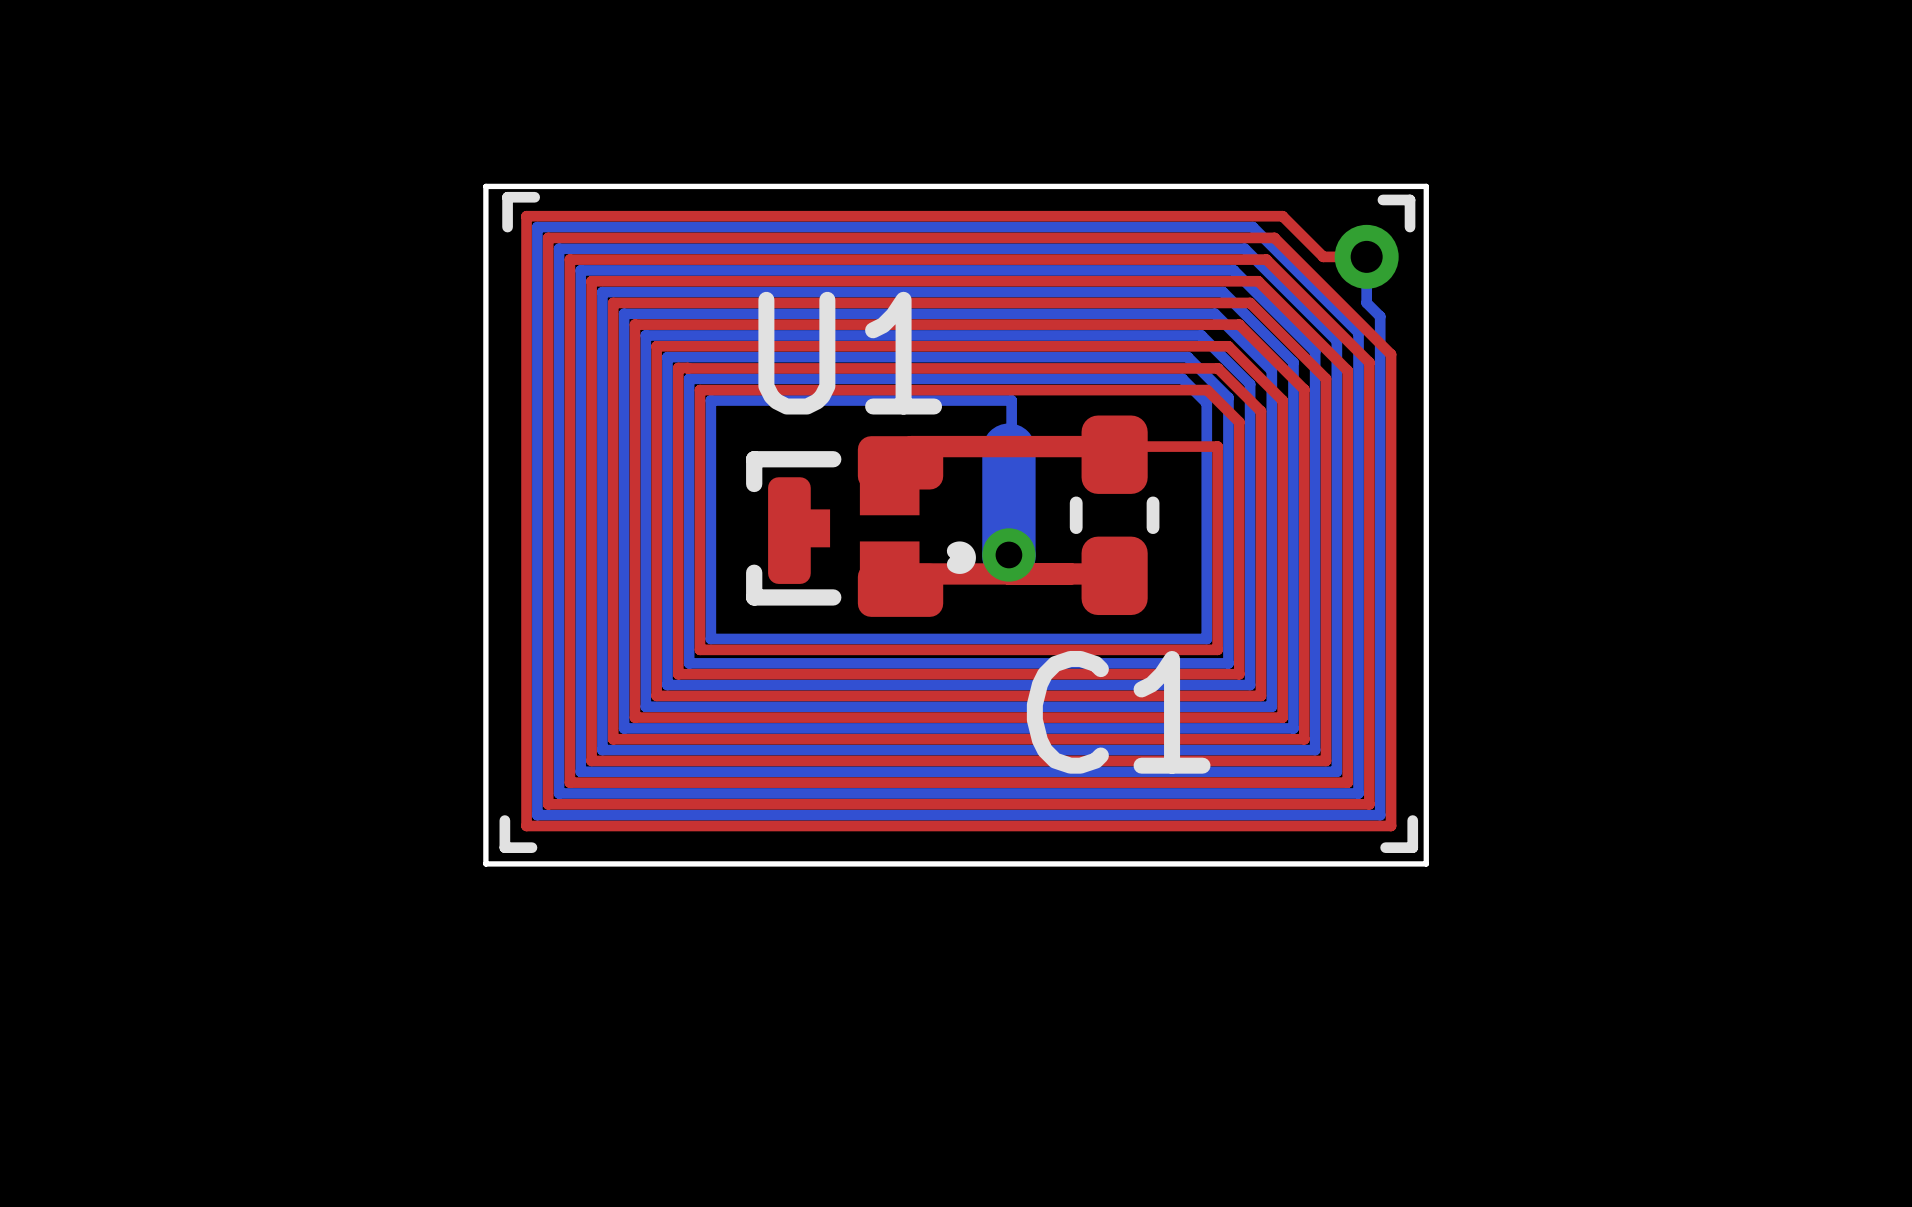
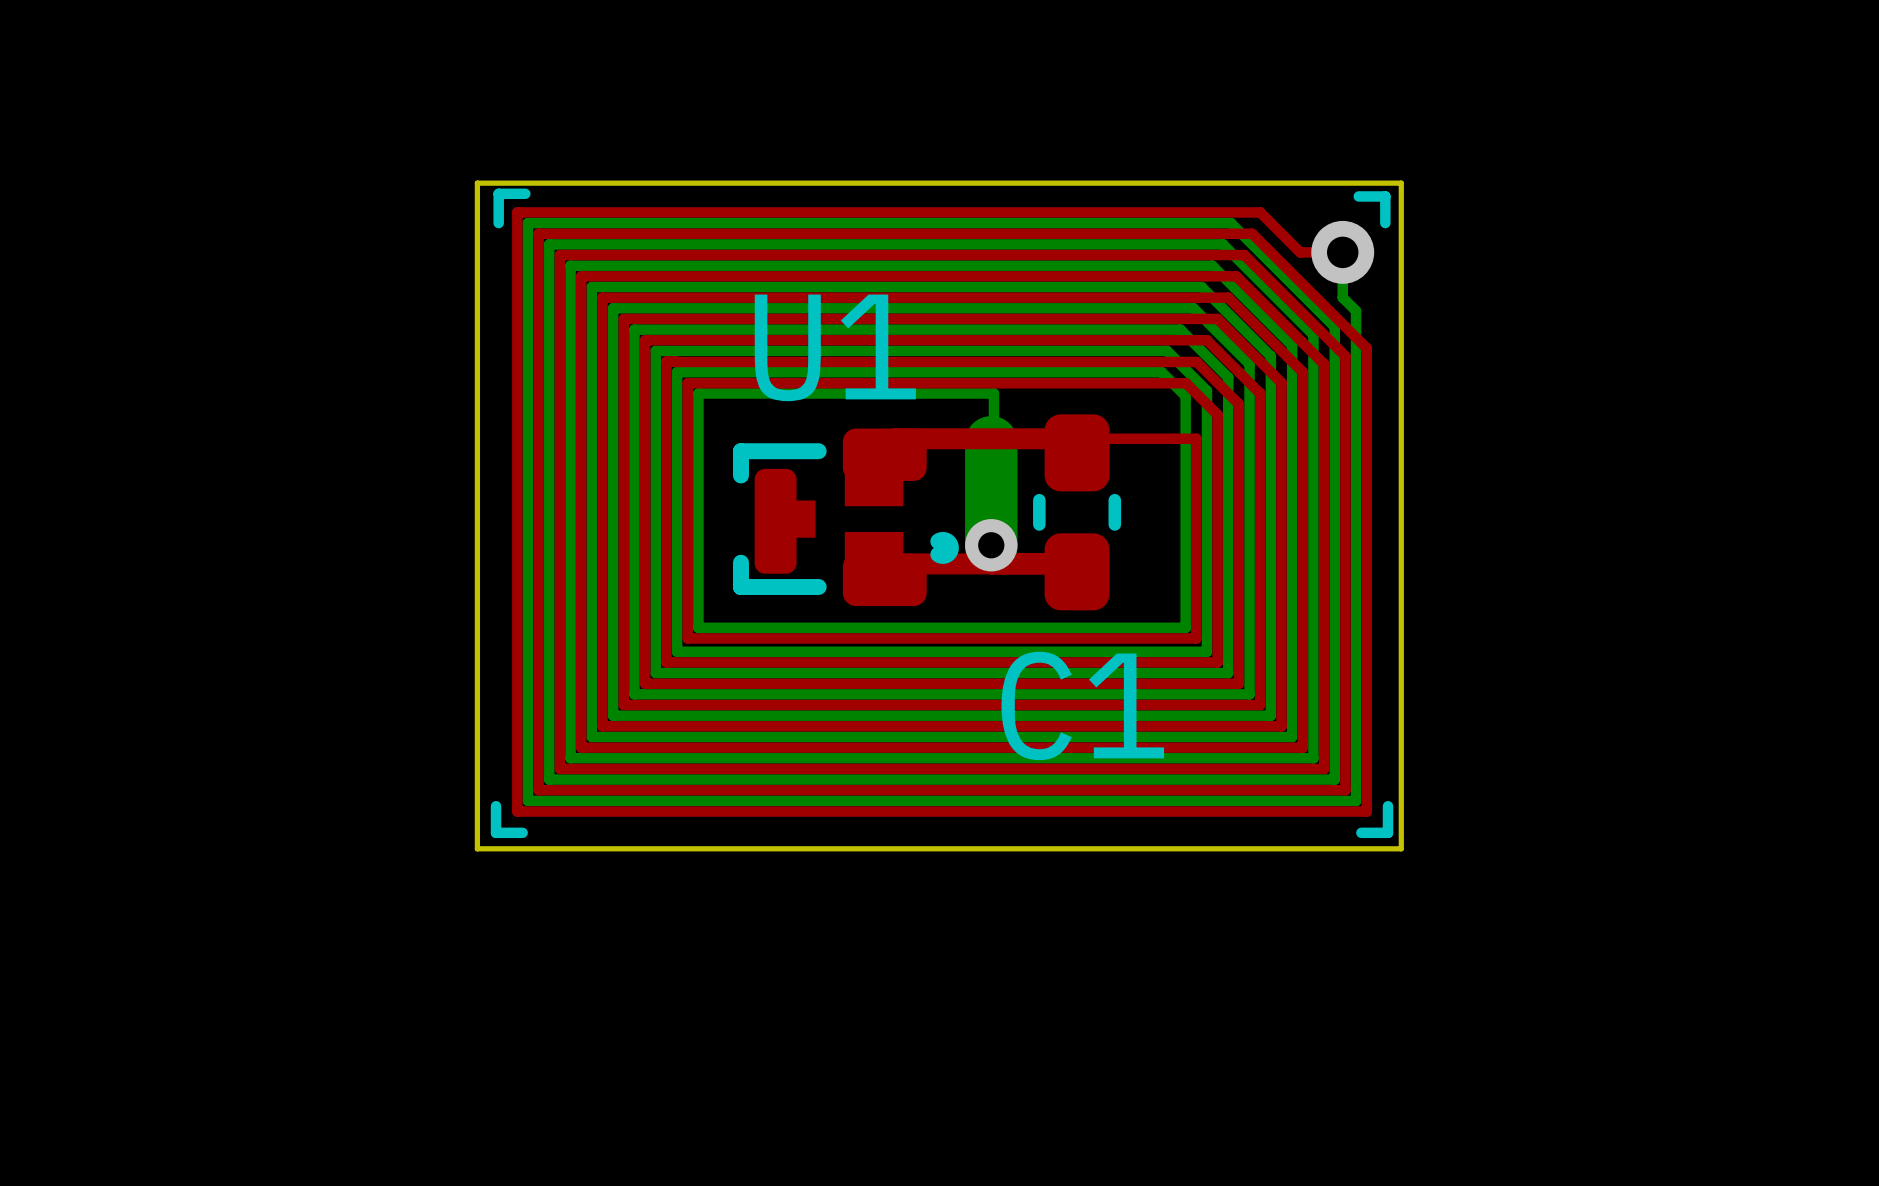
C1 position: (1114, 515) -> (1077, 512)

